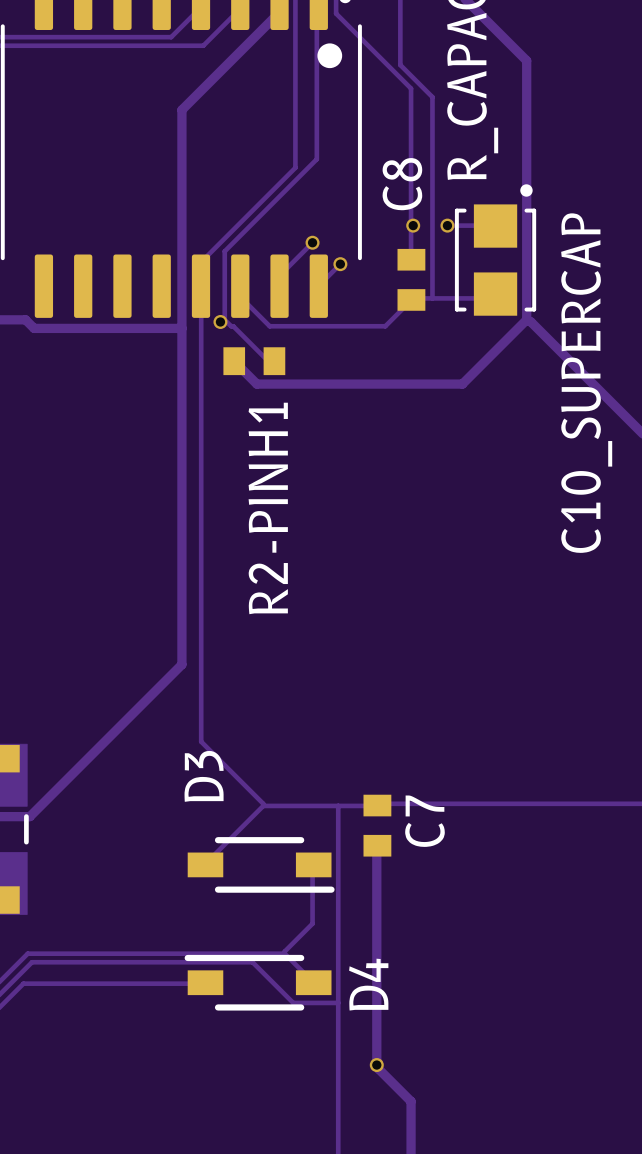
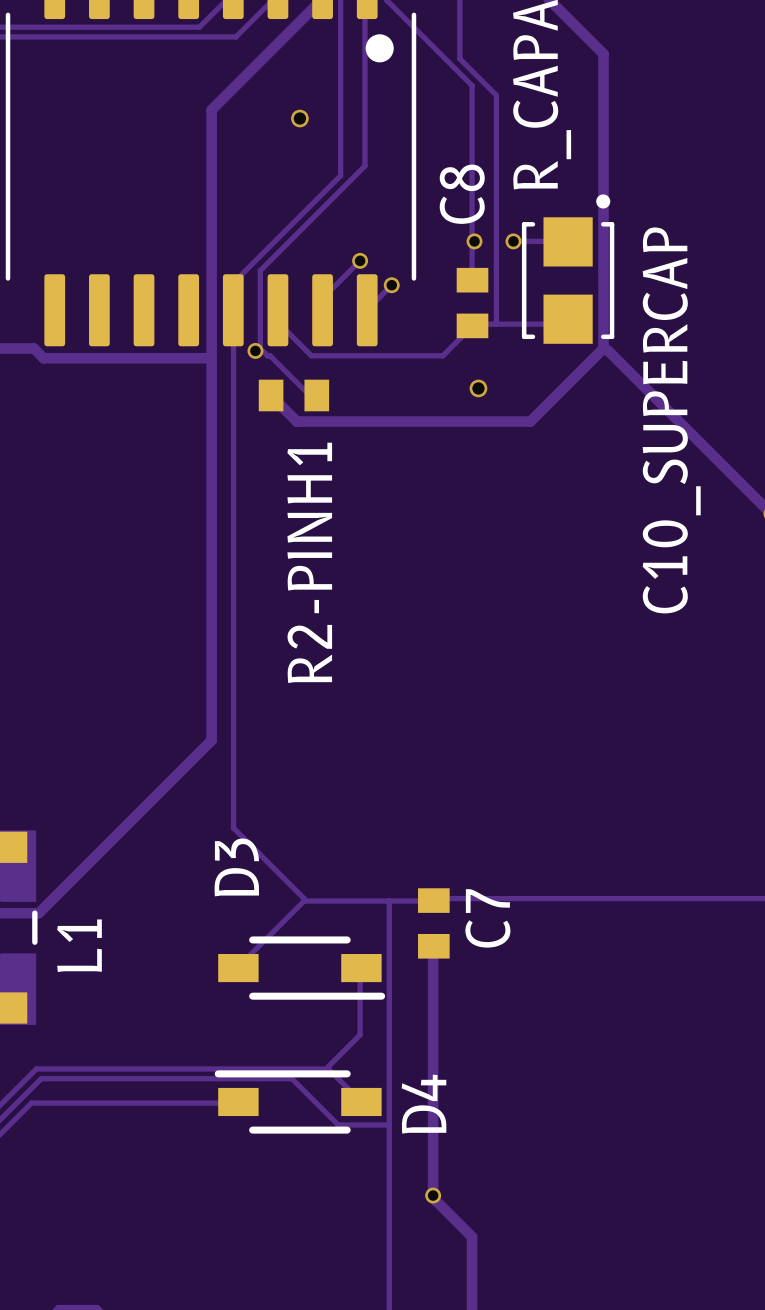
via: none -> (299, 118)
via: none -> (478, 388)
L1 name: none -> L1 (79, 945)

